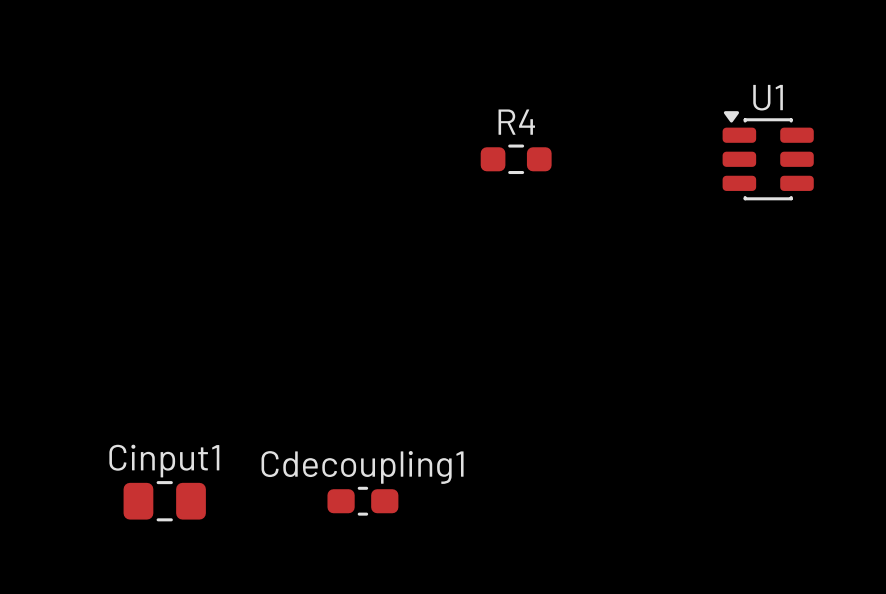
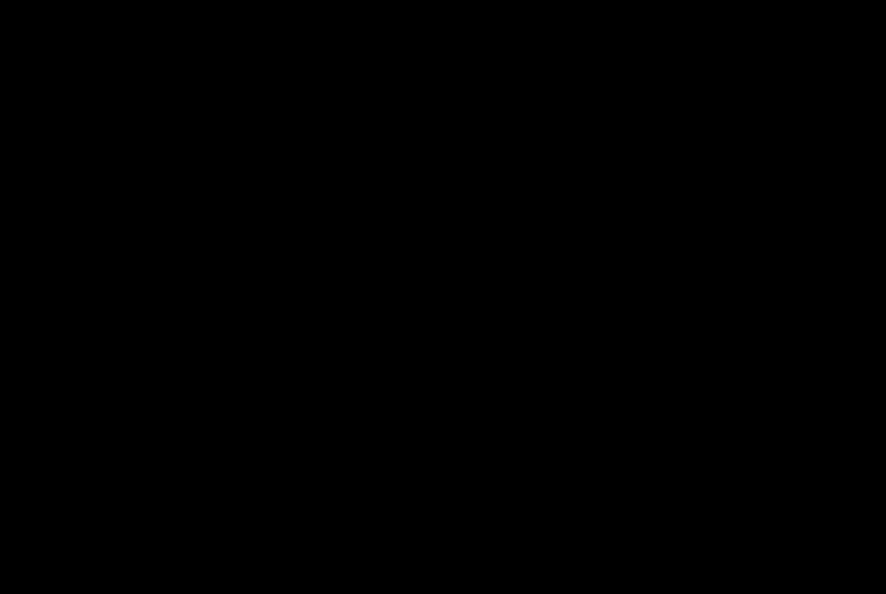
U1: (768, 155) -> none
R4: (516, 159) -> none
Cinput1: (164, 501) -> none
Cdecoupling1: (362, 501) -> none

